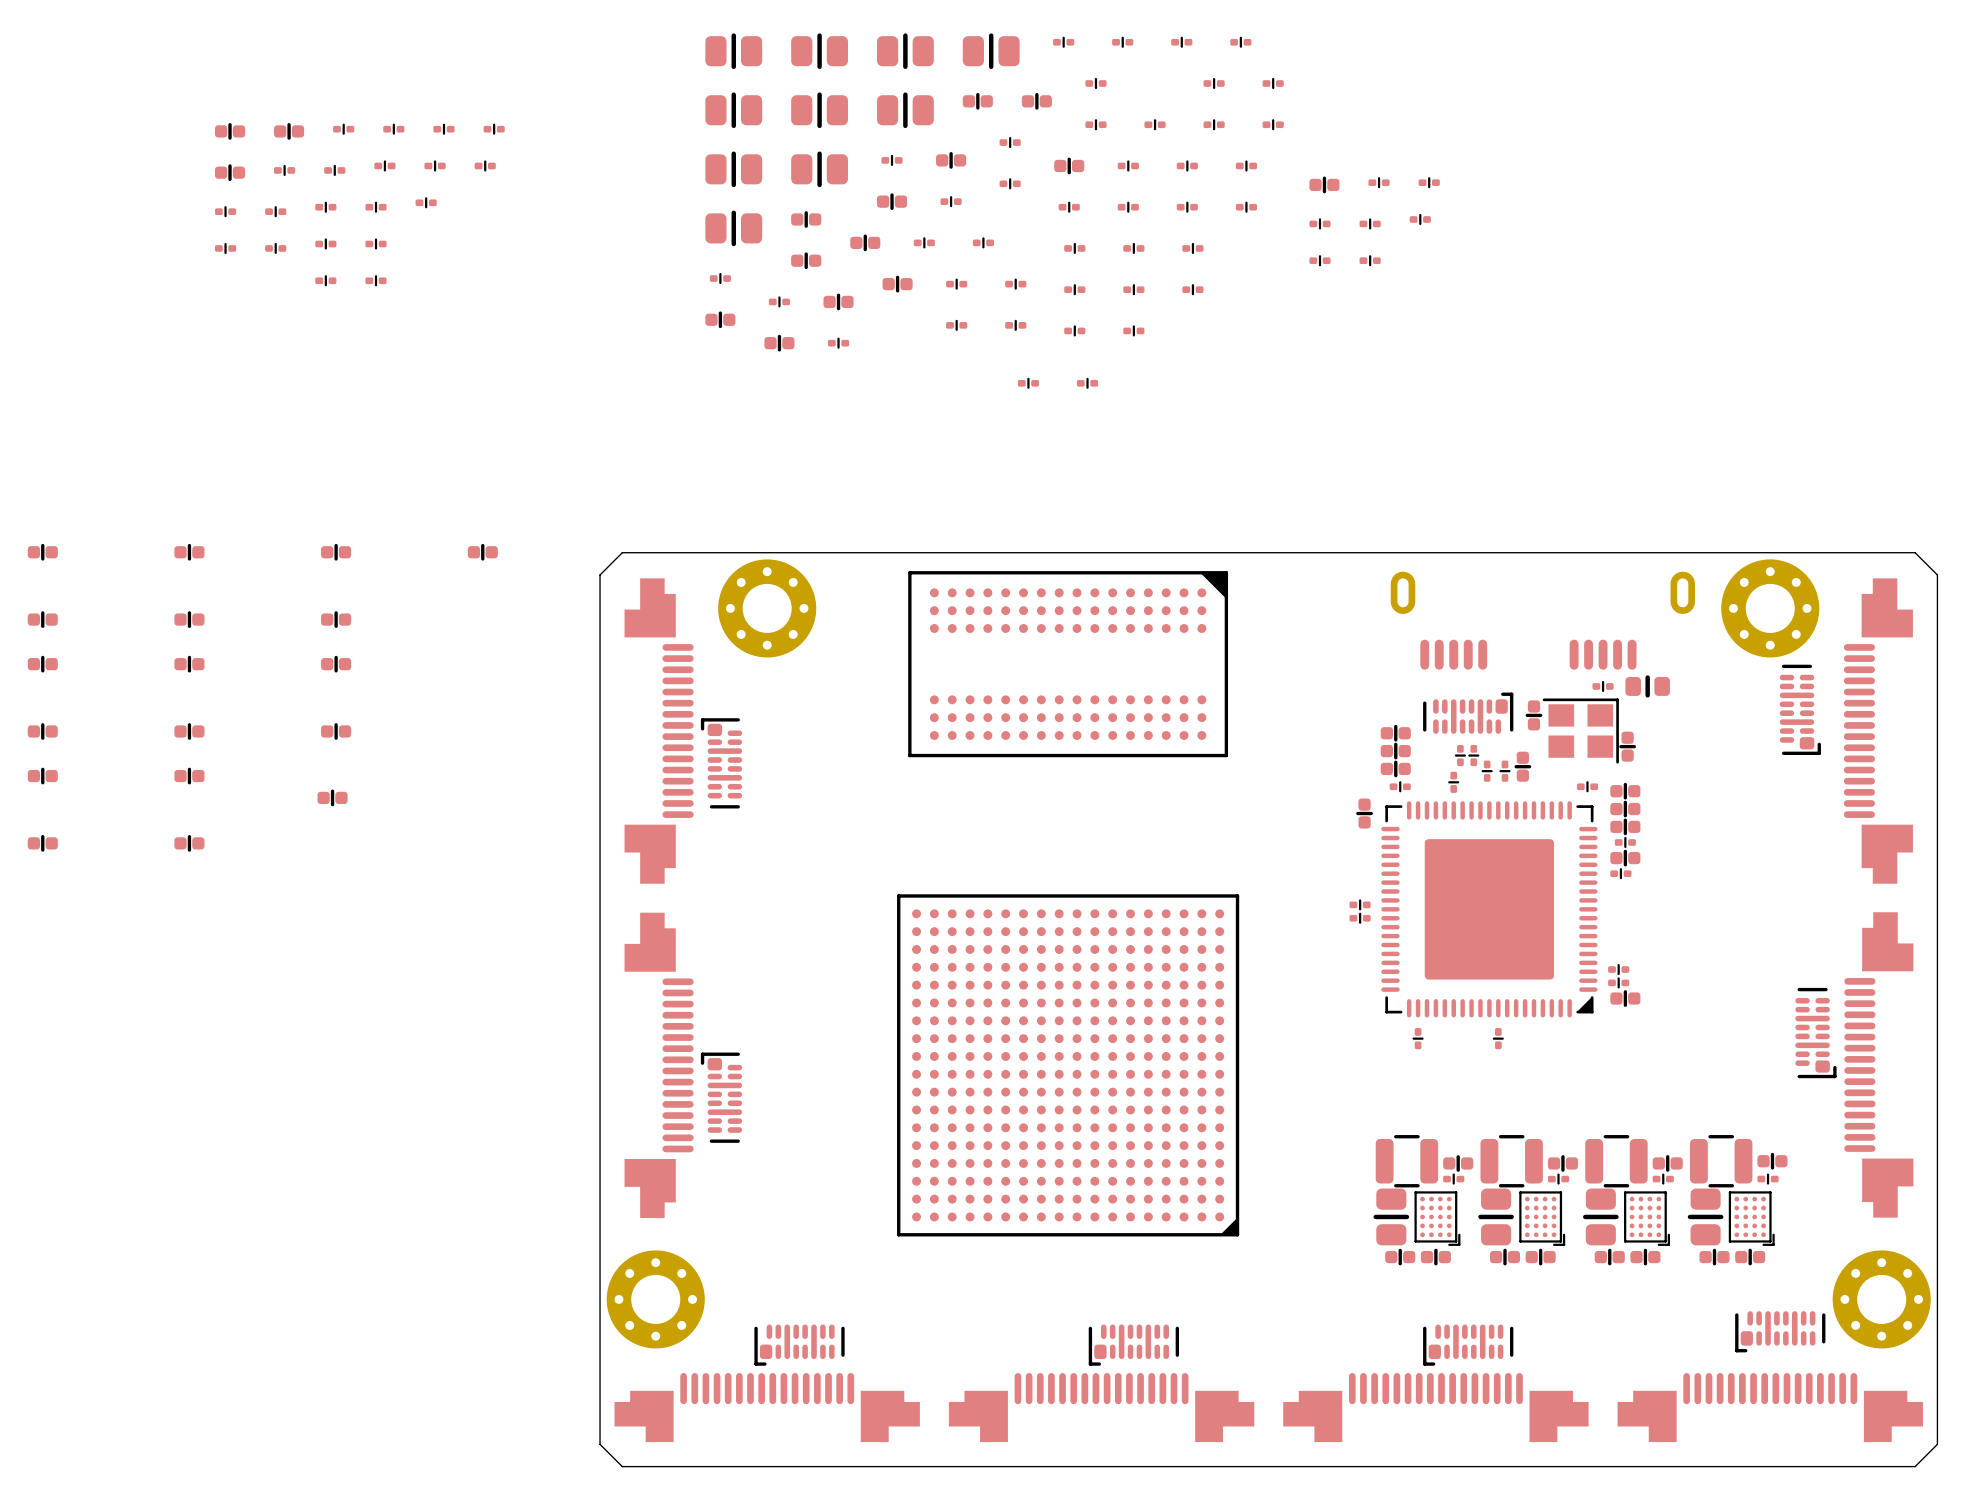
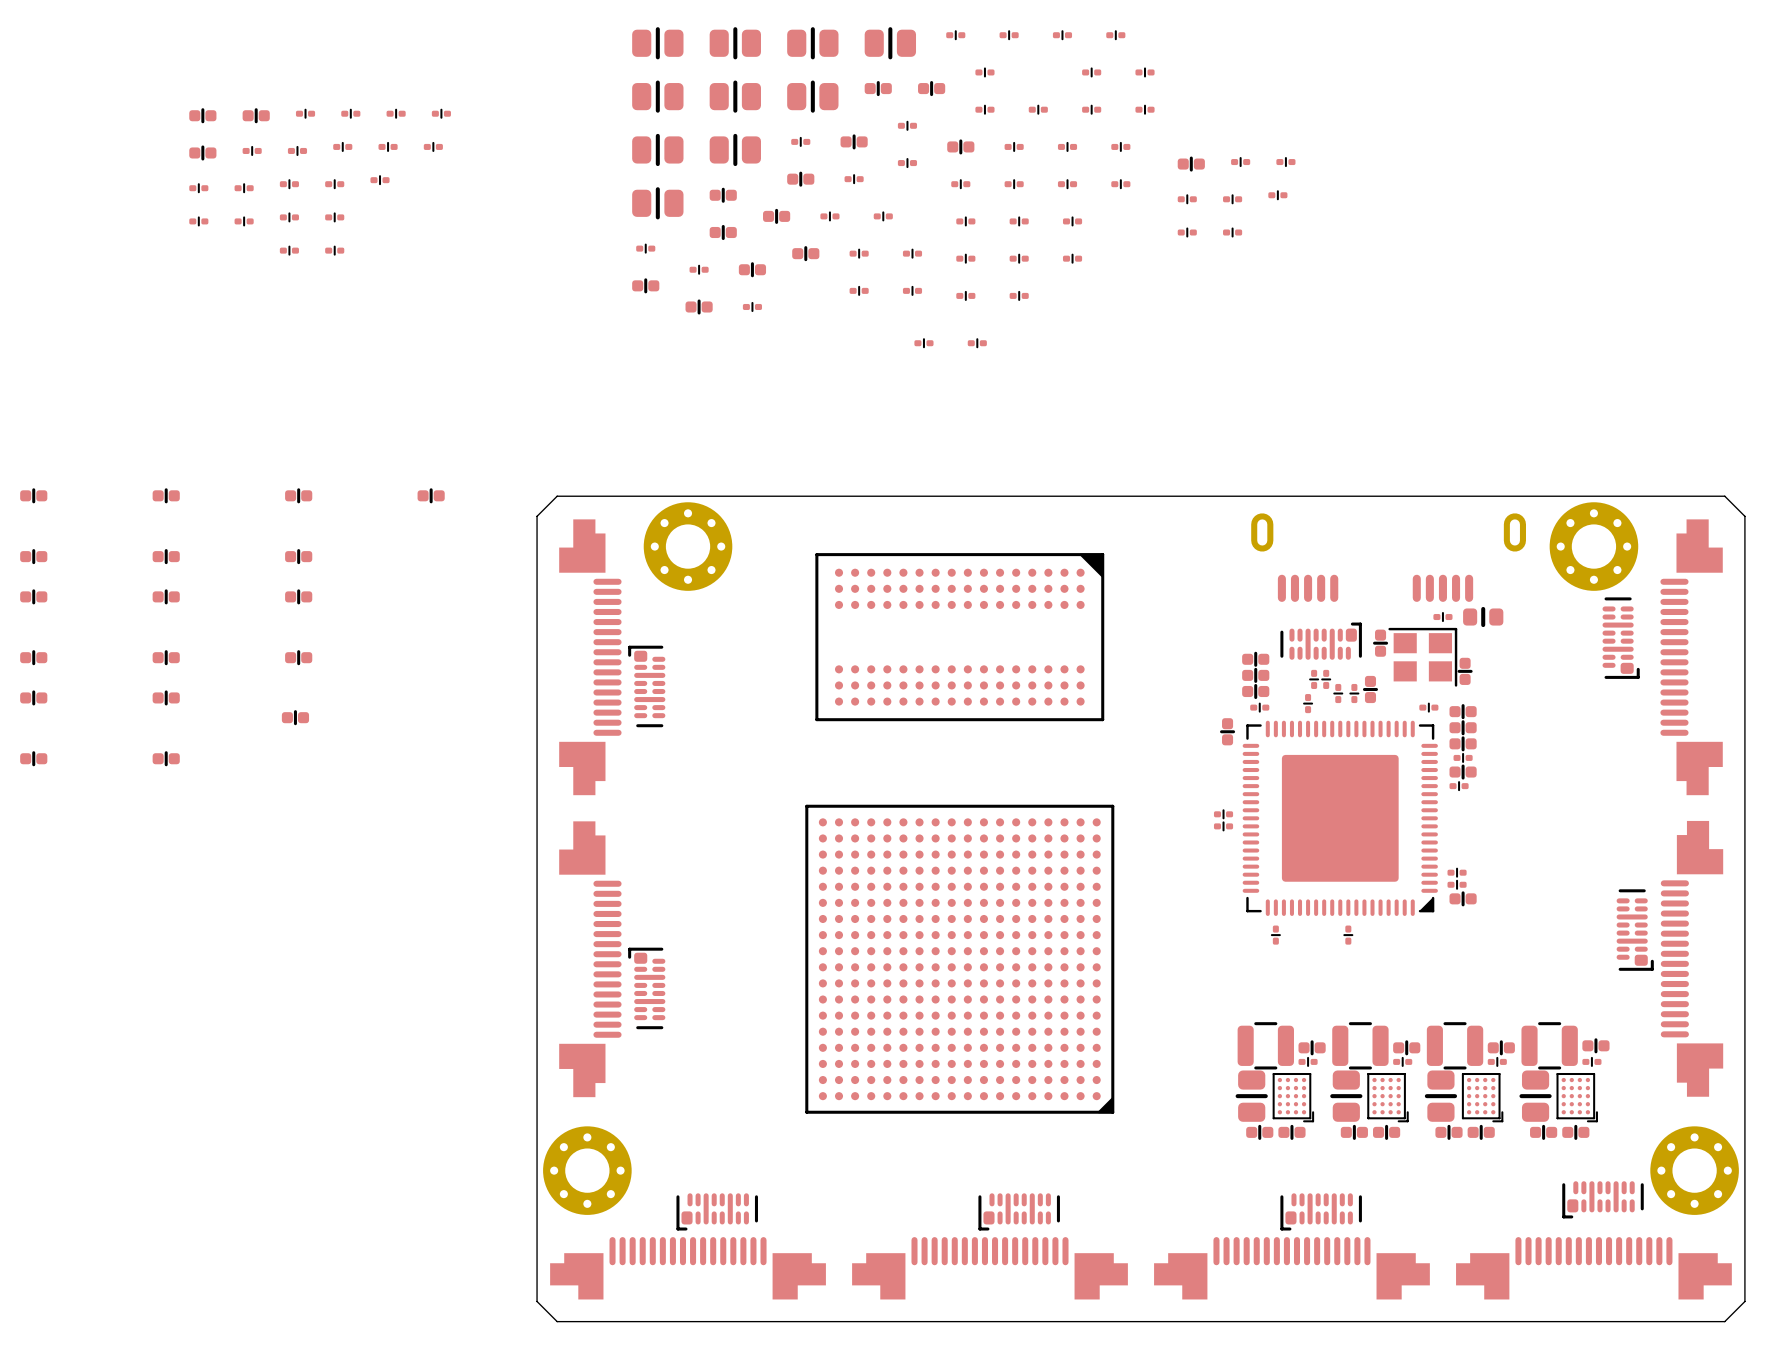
part position: (1068, 664) -> (959, 637)

